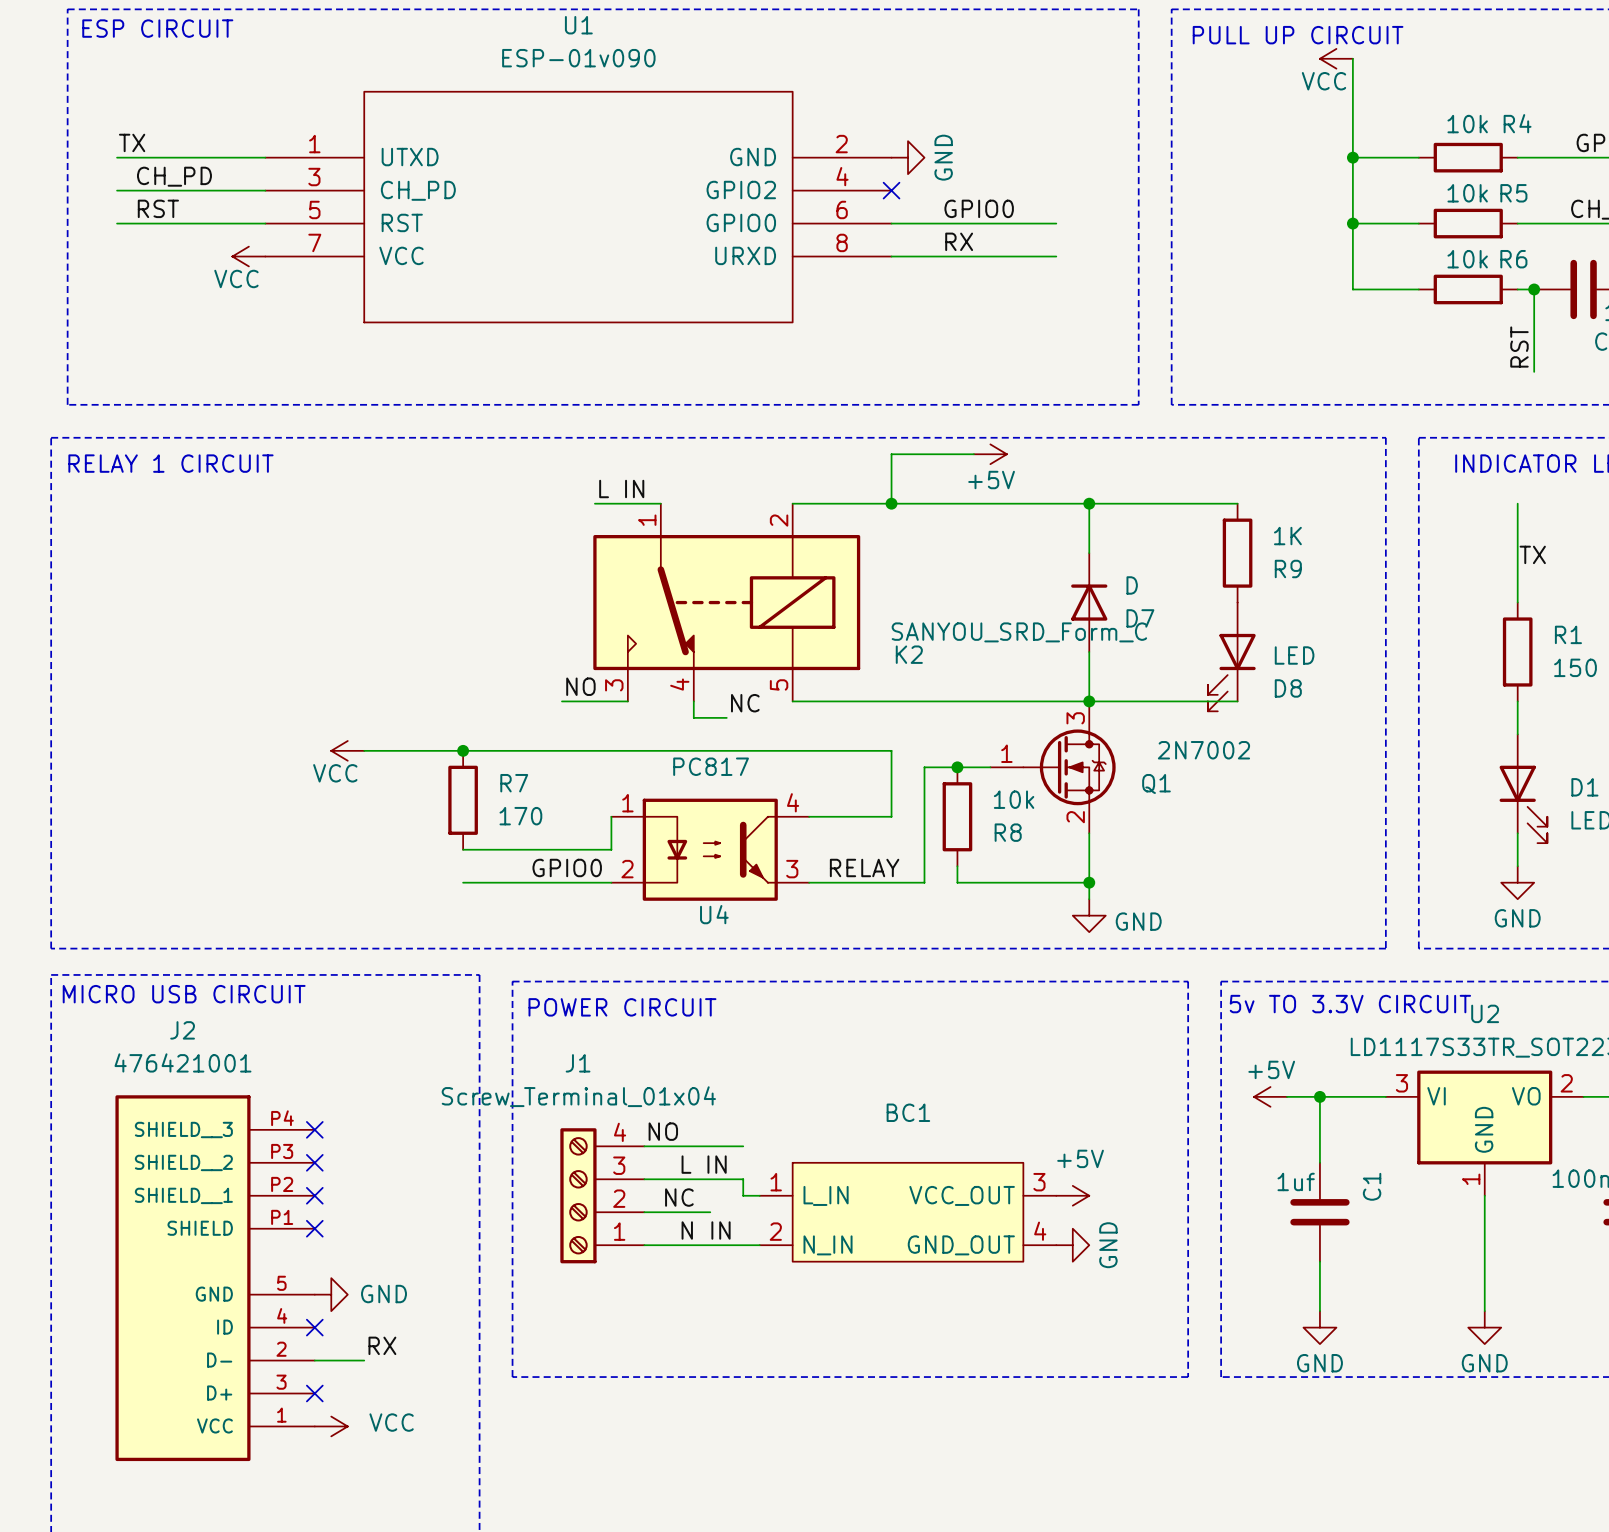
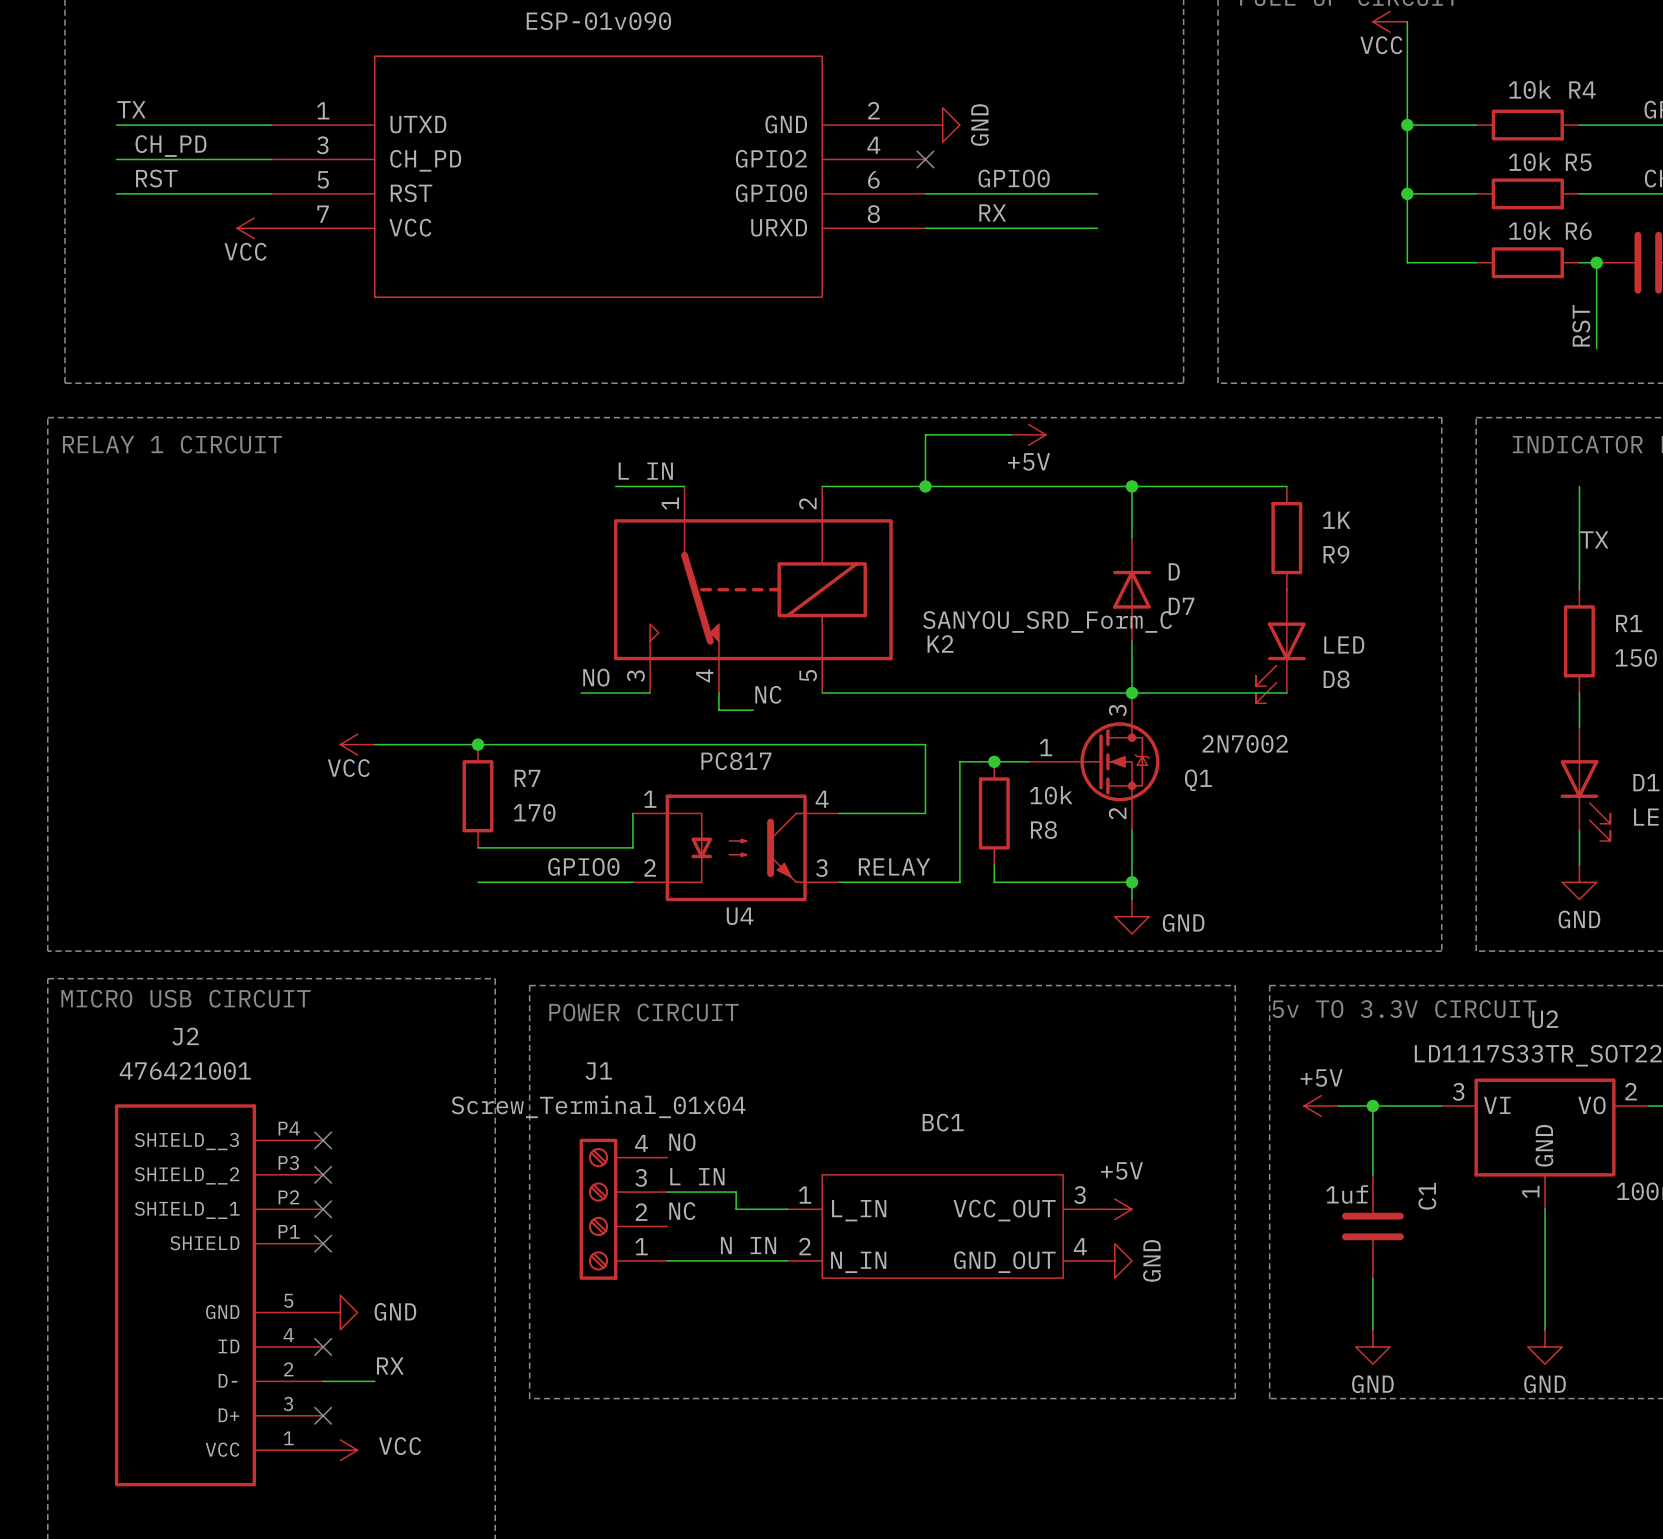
wire: (644, 1146) (743, 1146) -> none
label position: L IN (704, 1164) -> L IN (697, 1176)
wire: (710, 1179) (743, 1179) (743, 1195) -> (736, 1192) (736, 1209) (770, 1209)
label position: NC (679, 1197) -> NC (682, 1211)
wire: (644, 1212) (710, 1212) -> none
label position: N IN (706, 1230) -> N IN (748, 1245)

